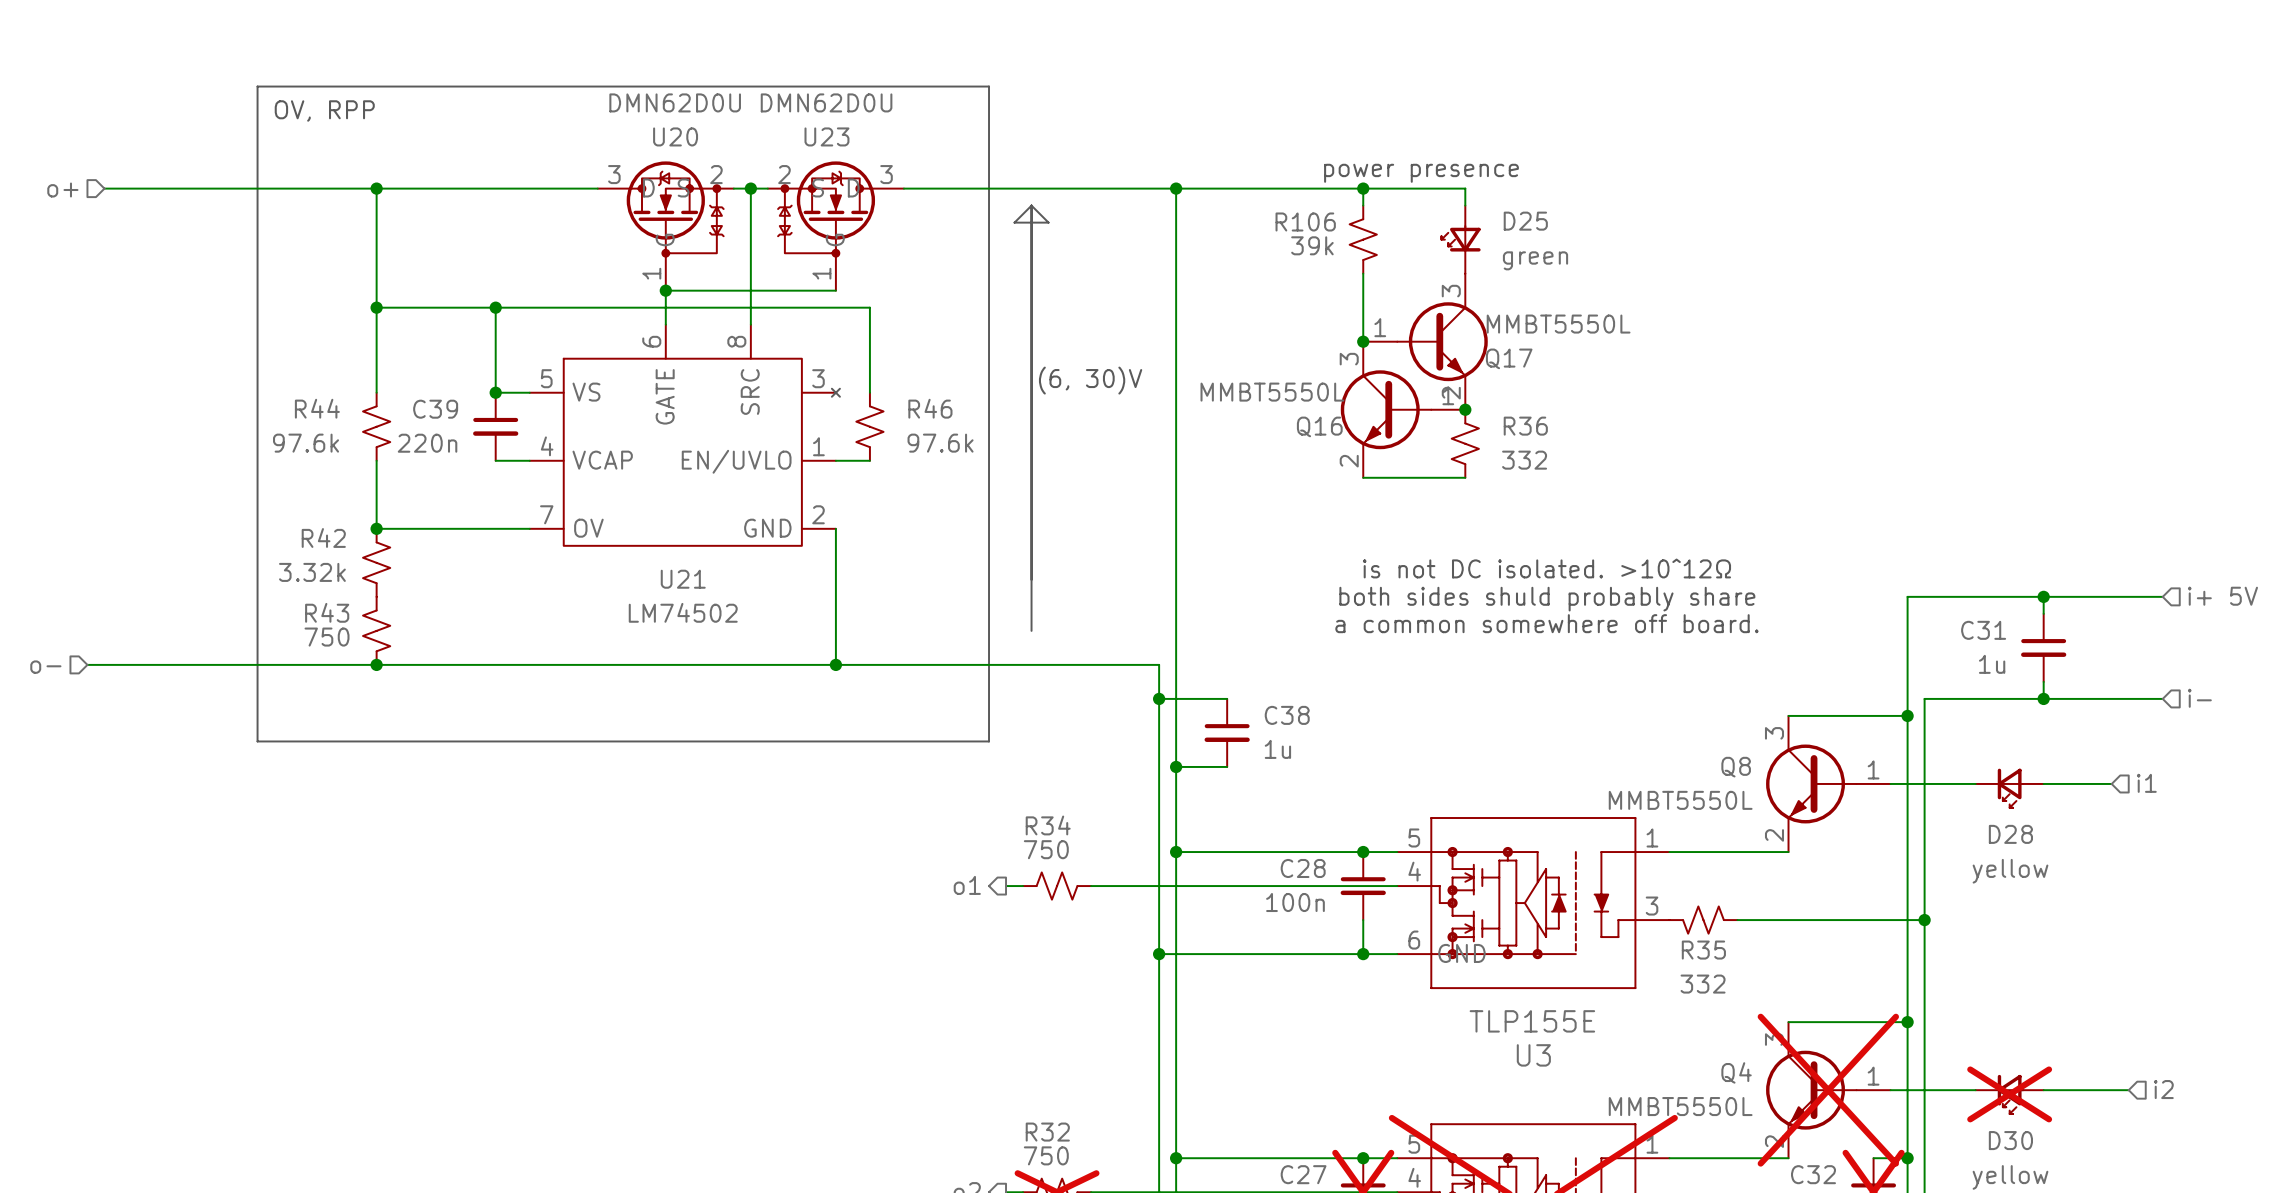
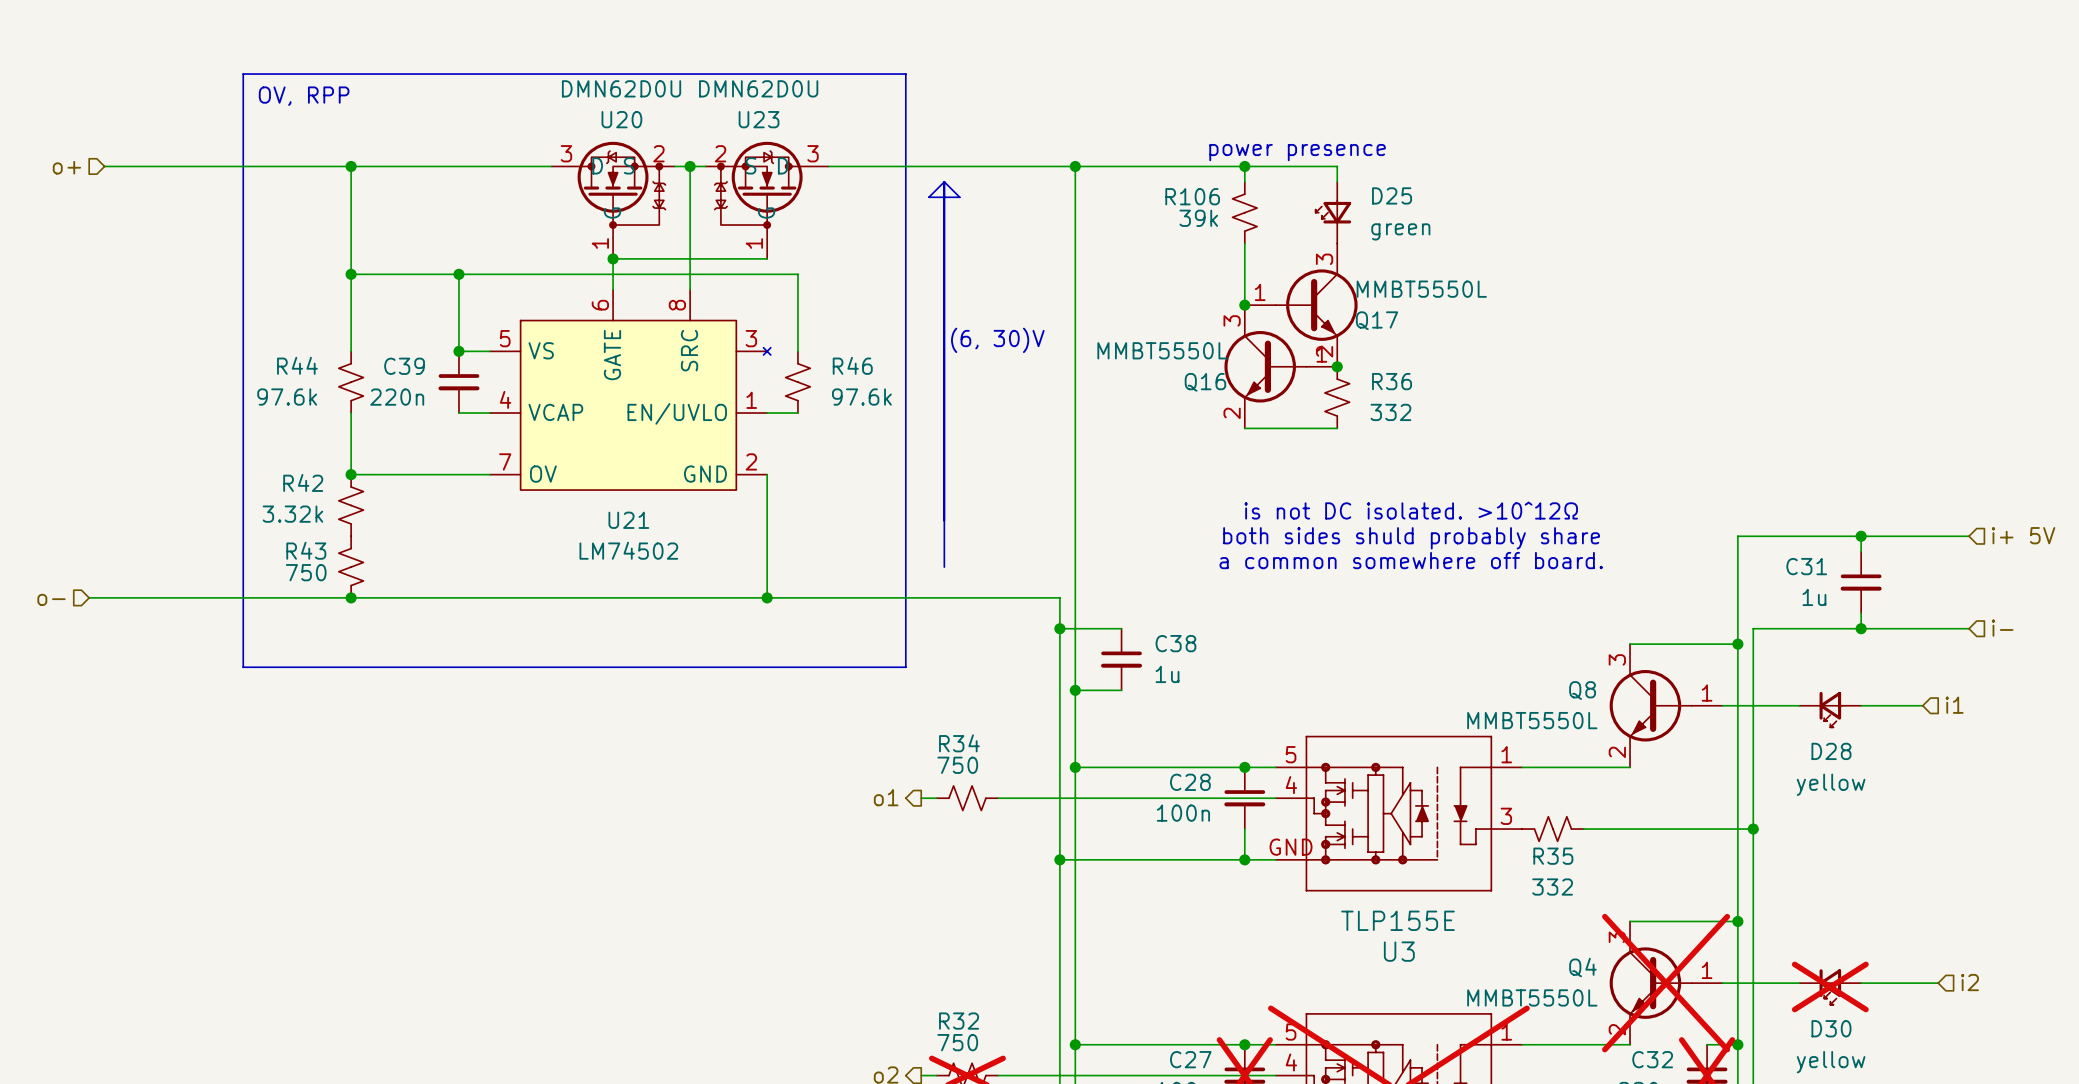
U3 pin number: 6 (1414, 940) -> GND (1291, 847)
U3 pin name: GND (1461, 953) -> none

